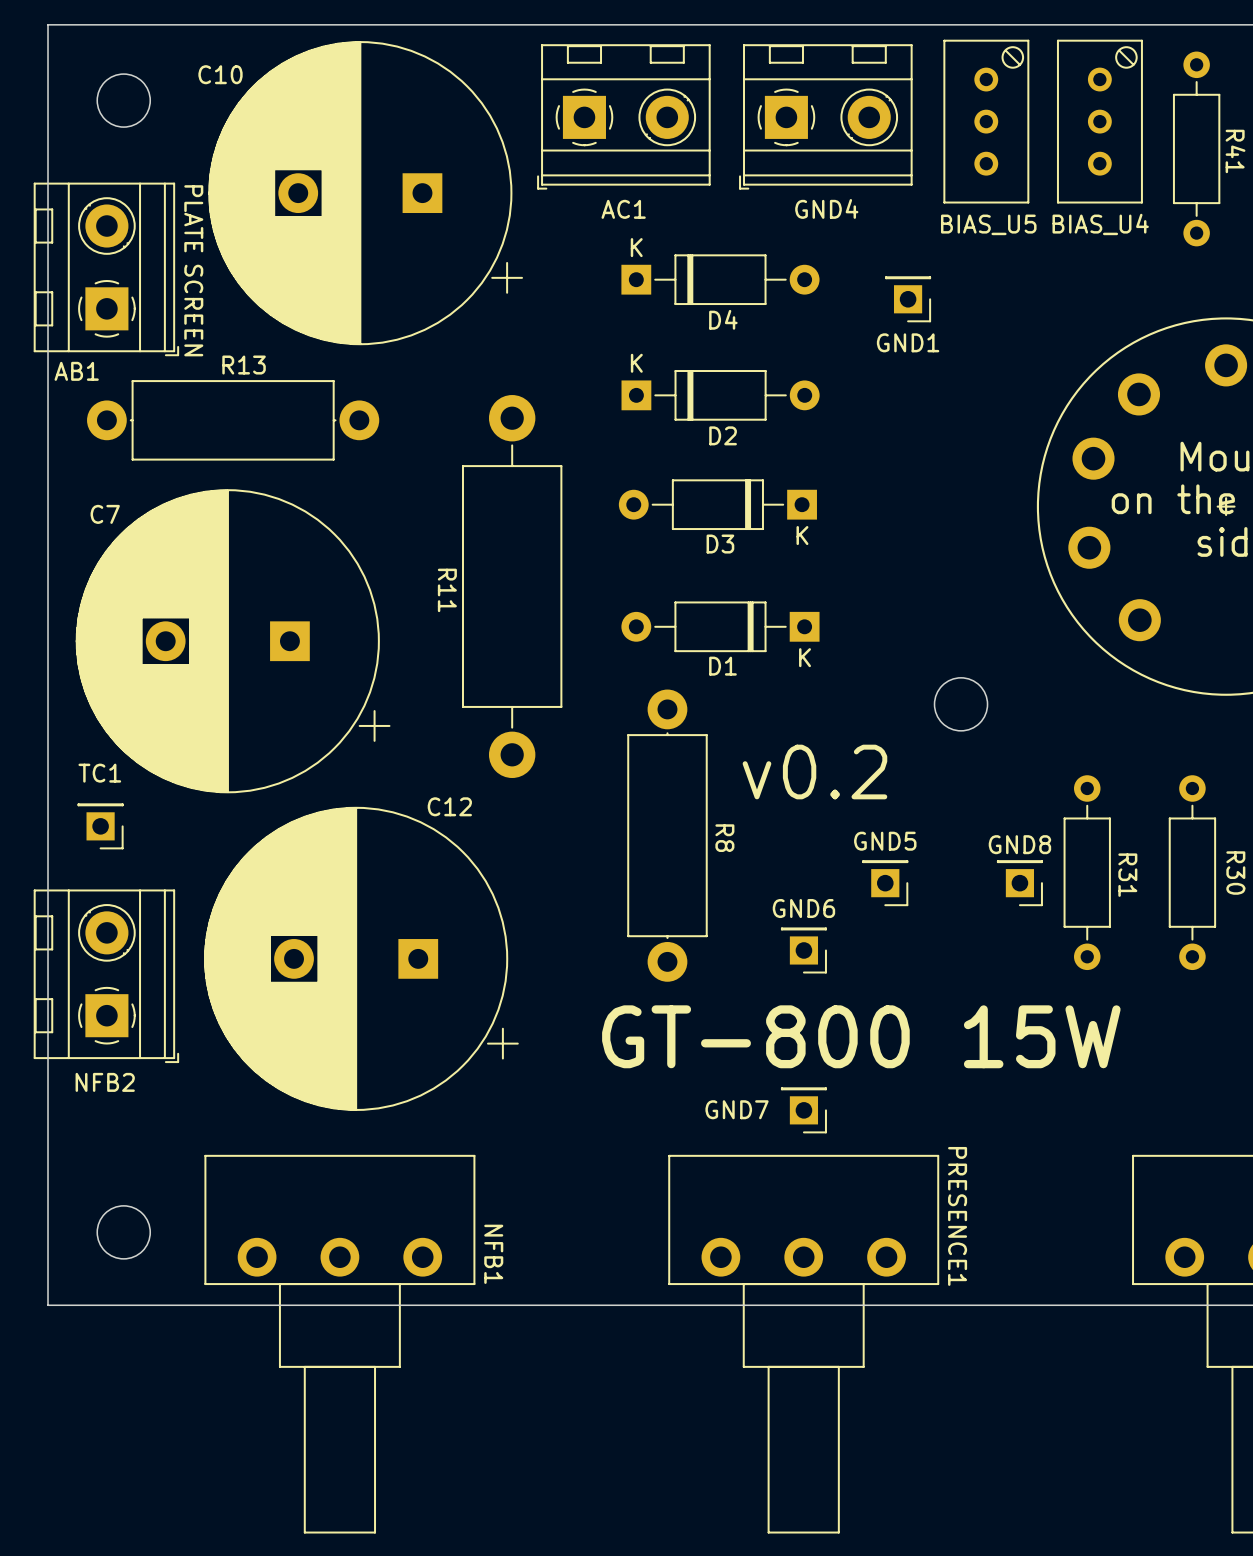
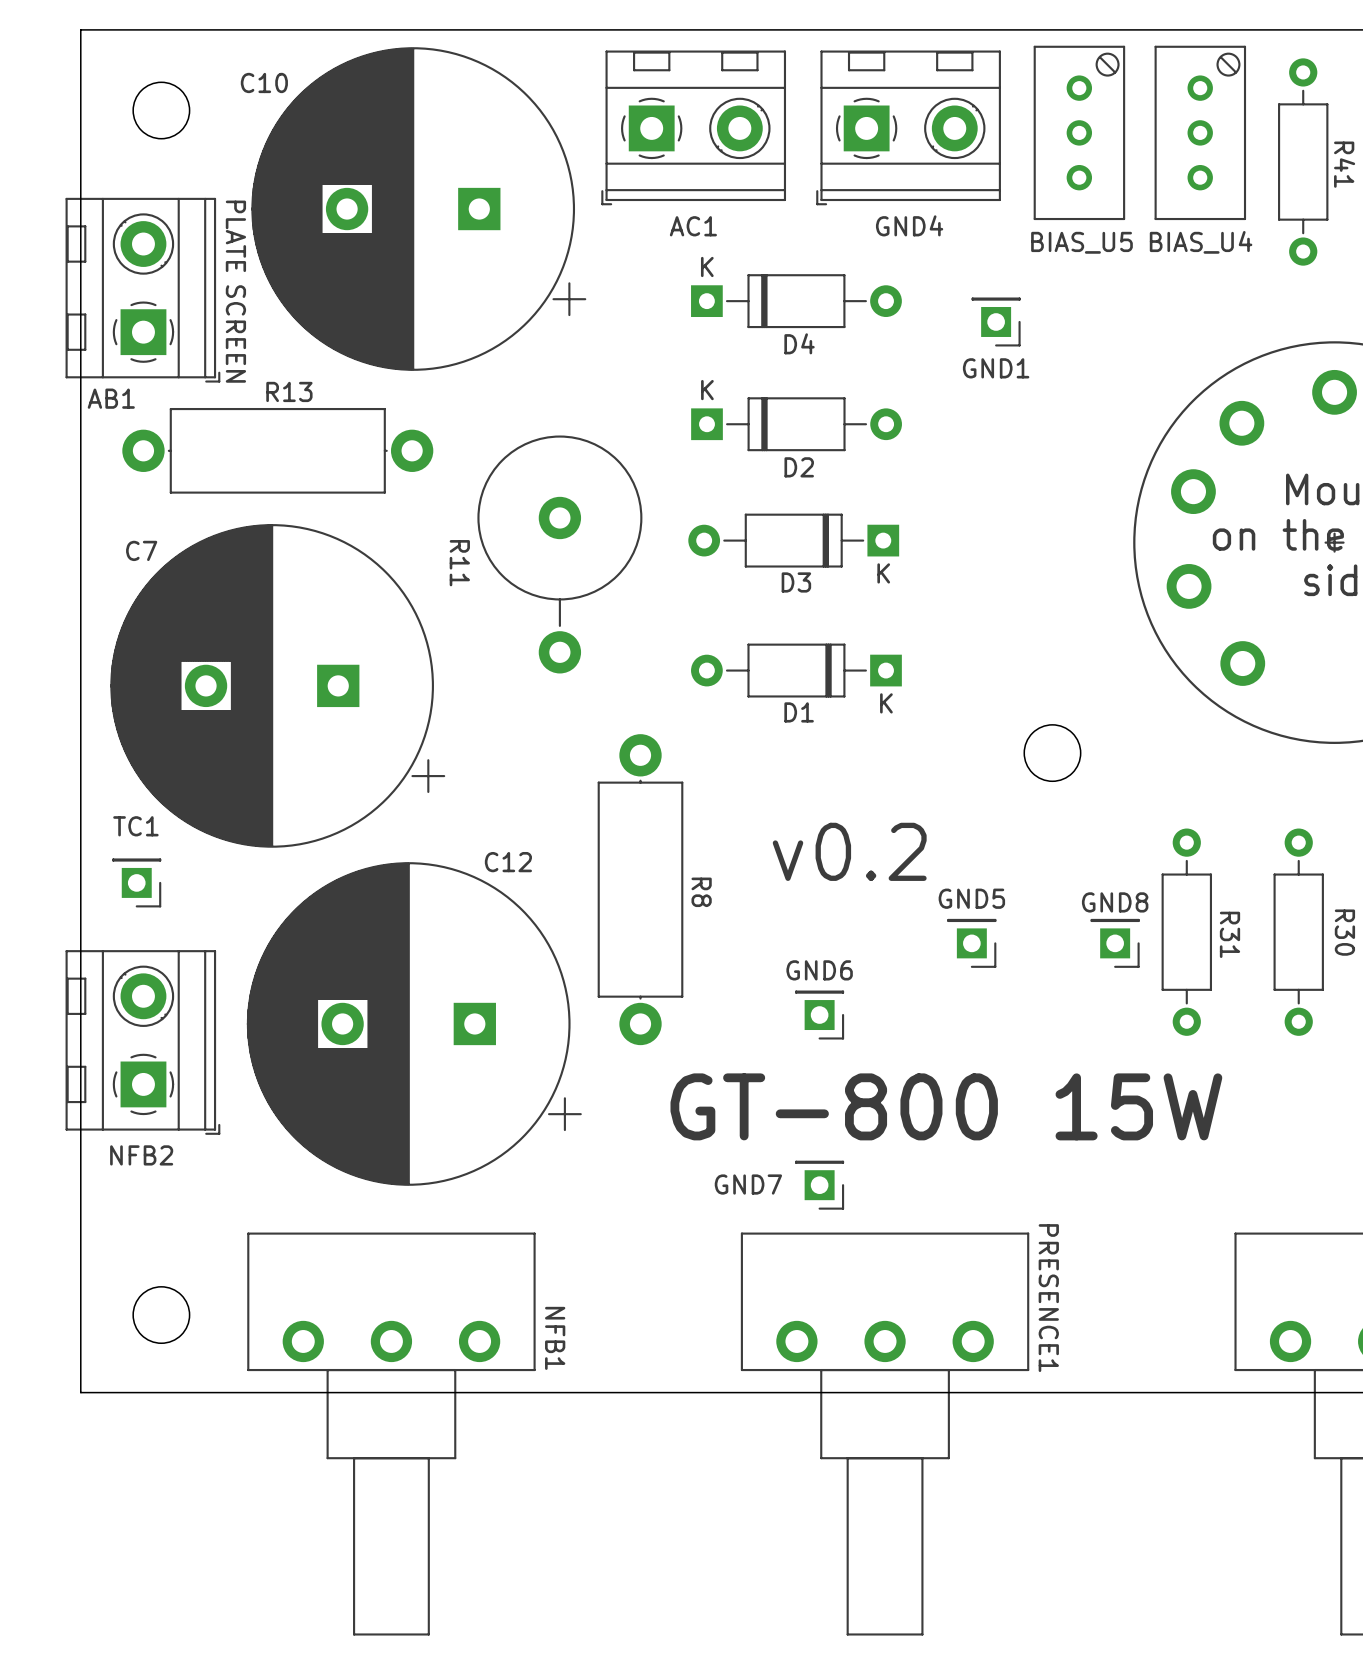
R11 footprint: [461, 395, 563, 779] -> [477, 435, 643, 674]
text position: v0.2 (814, 772) -> v0.2 (849, 851)
R8 position: (667, 835) -> (640, 889)
GND6 position: (803, 950) -> (819, 1015)
GND7 position: (803, 1110) -> (819, 1185)

